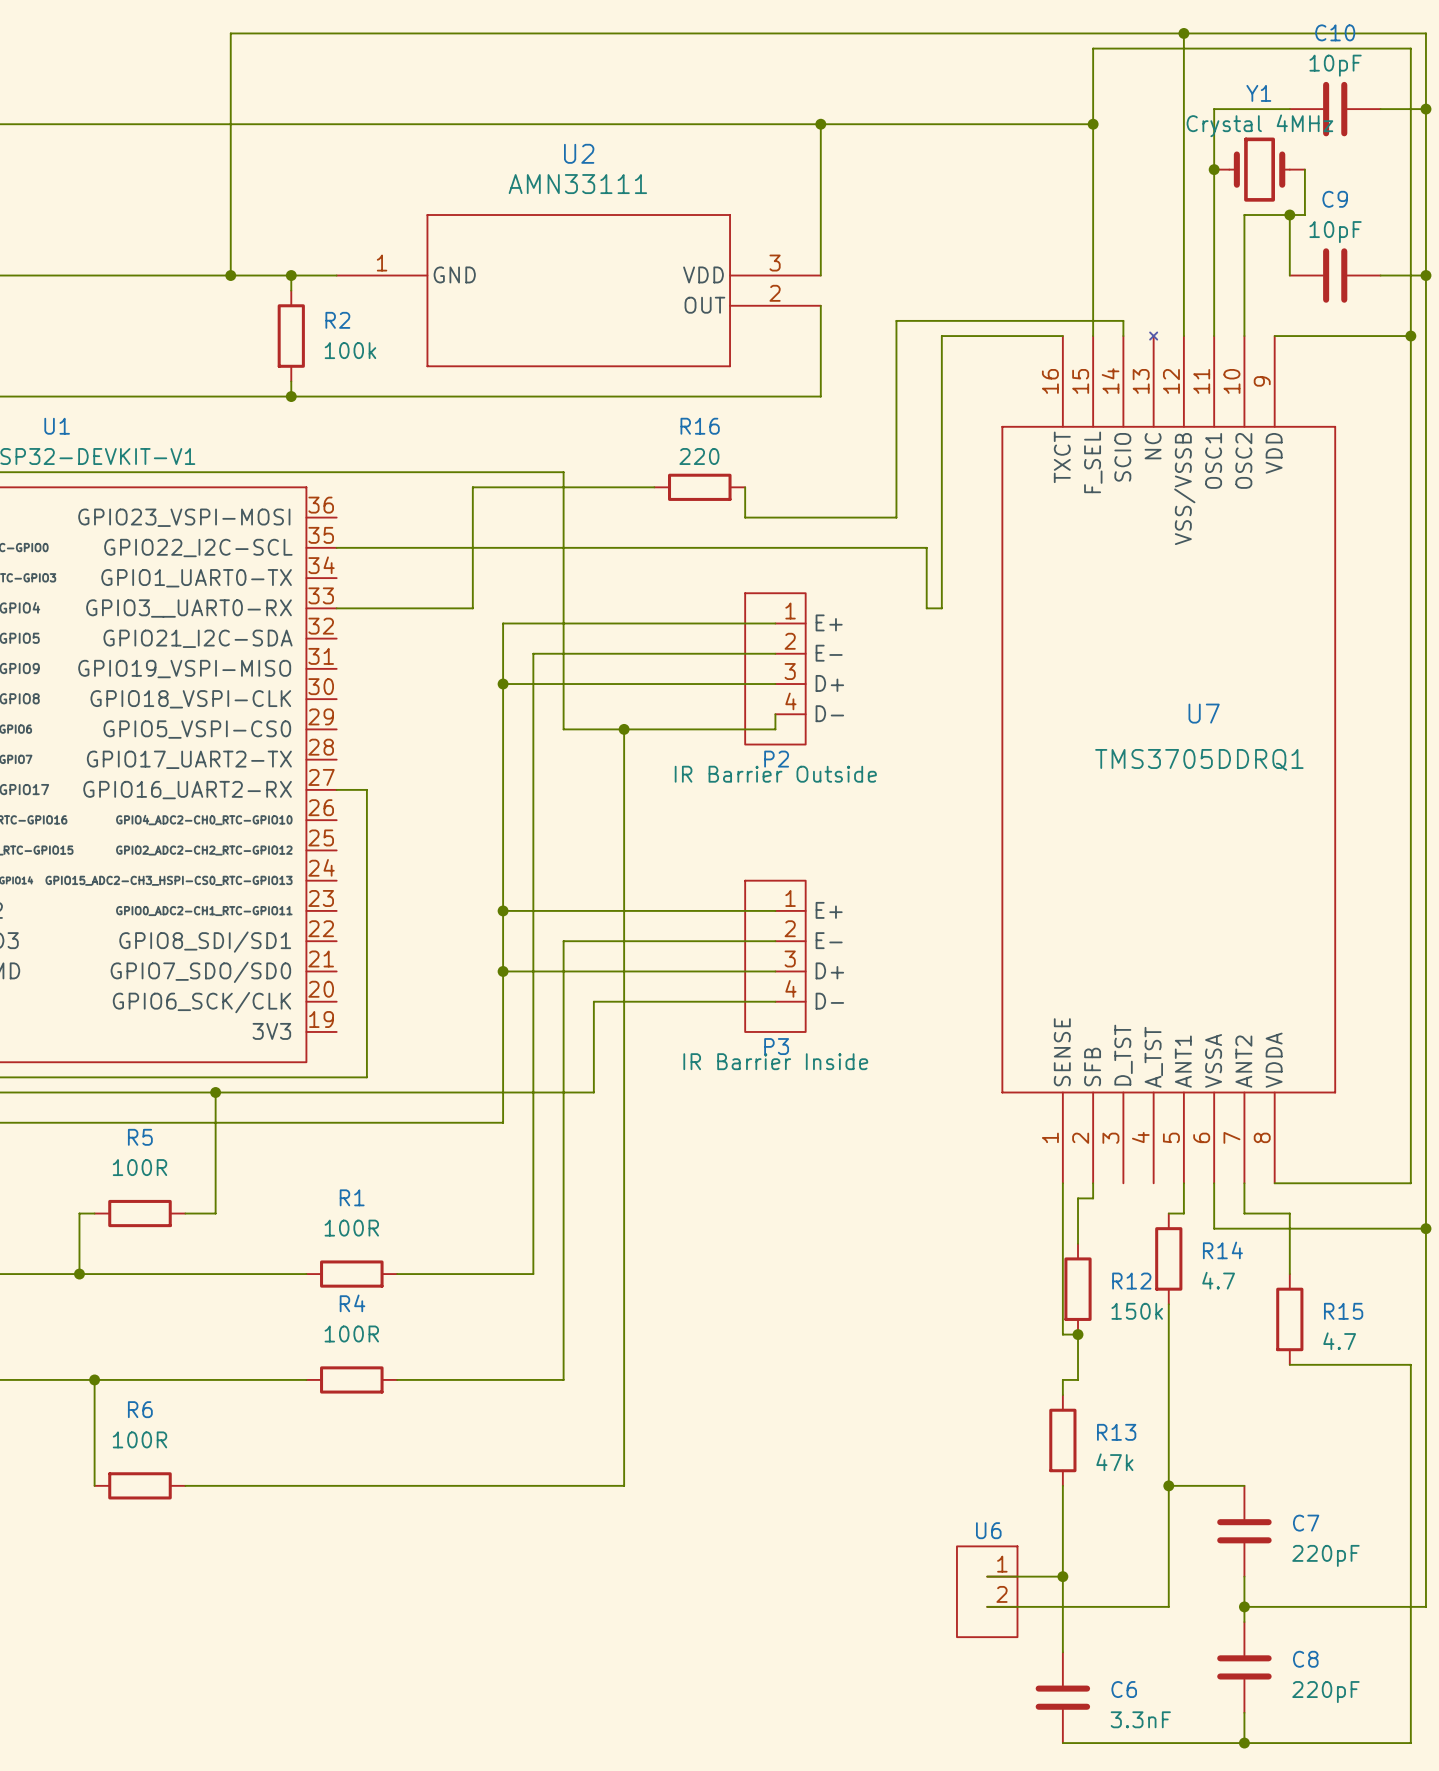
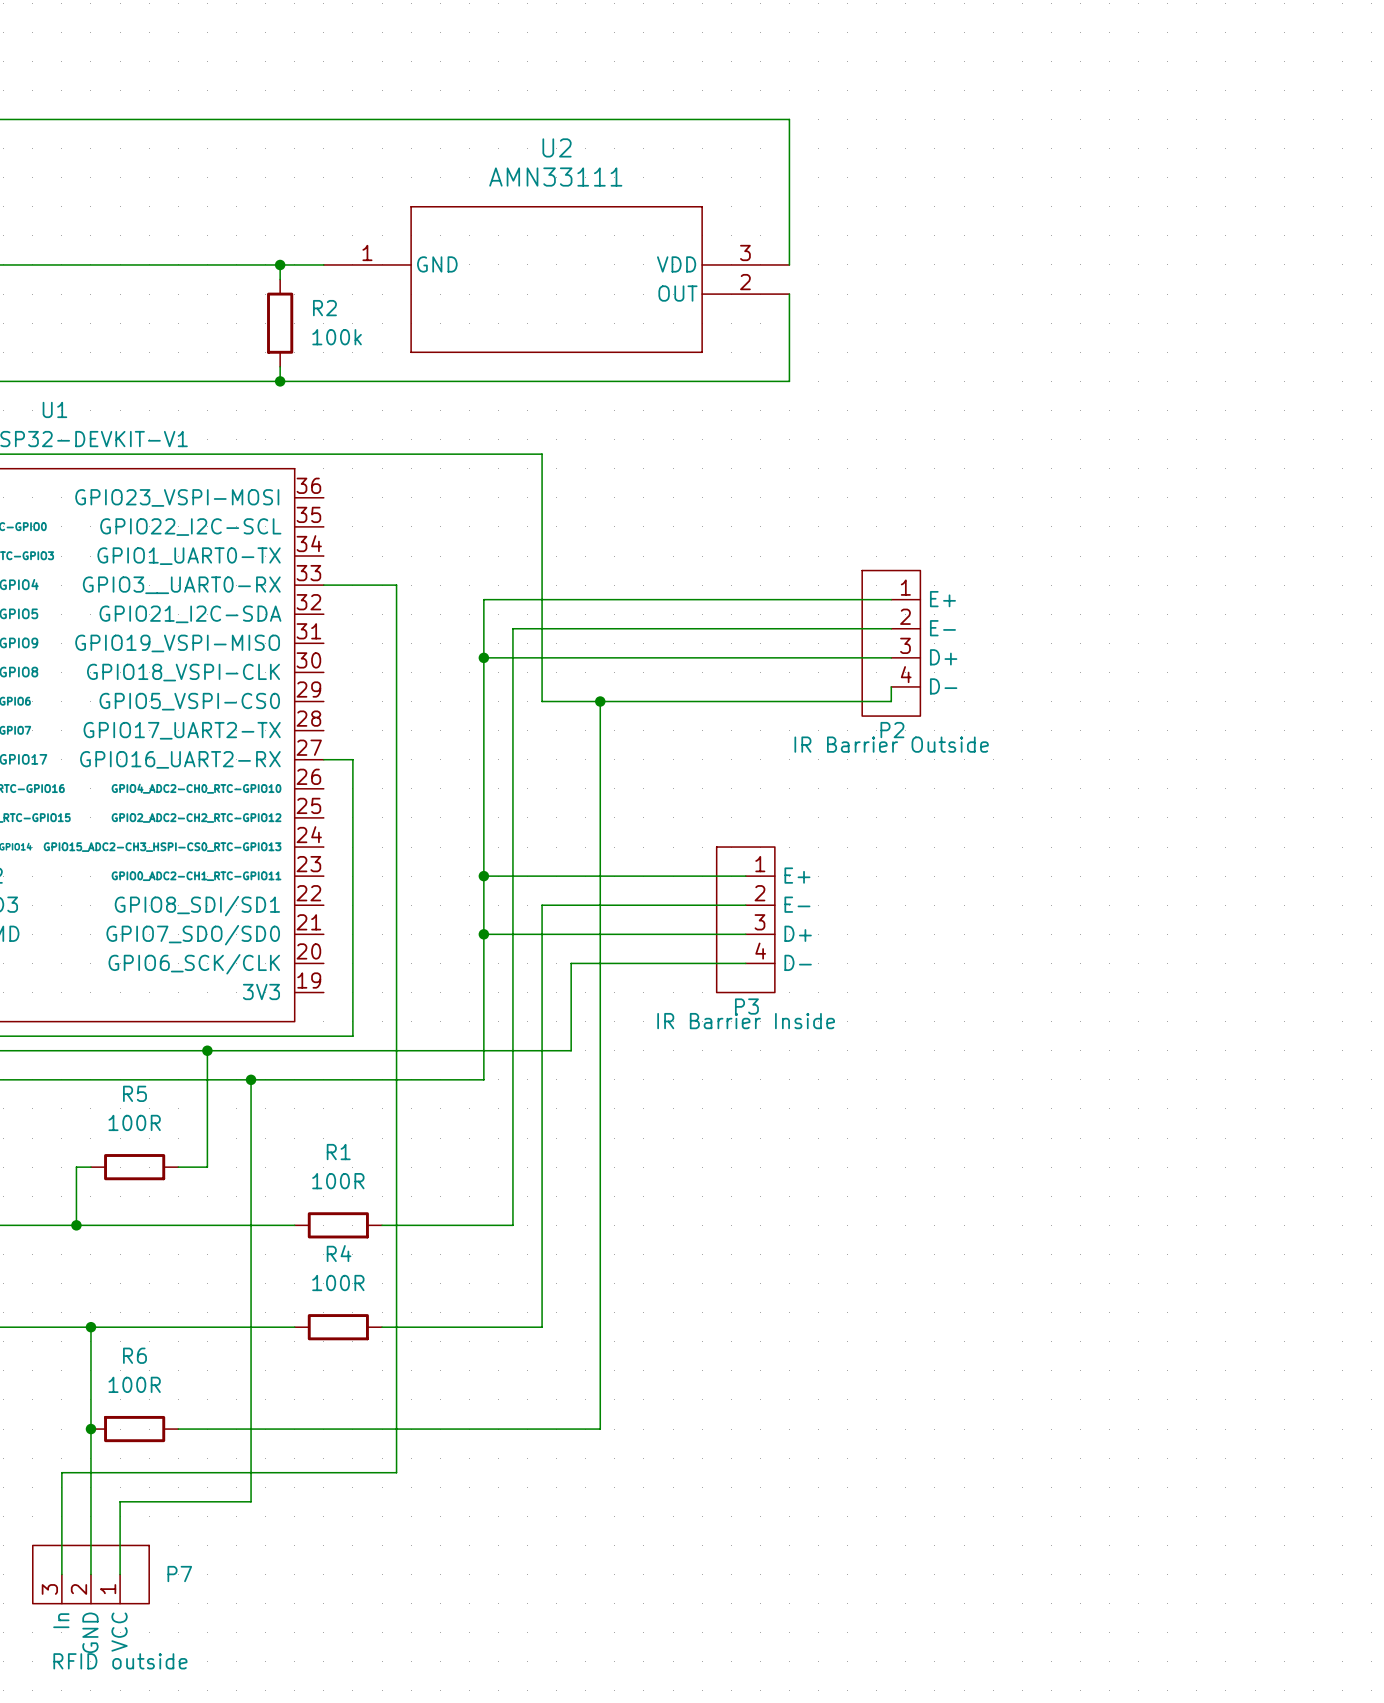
wire: (1183, 33) (1183, 336) -> none
junction: (1183, 33) -> none
wire: (1289, 109) (1214, 109) (1214, 336) -> none
C10: 10pF (1335, 109) -> none
wire: (1380, 109) (1425, 109) -> none
junction: (1425, 109) -> none
wire: (820, 124) (1093, 124) -> none
junction: (820, 124) -> none
junction: (1093, 124) -> none
junction: (1214, 169) -> none
Y1: Crystal 4MHz (1259, 169) -> none
wire: (1304, 169) (1304, 215) (1244, 215) (1244, 336) -> none
wire: (1289, 215) (1289, 275) -> none
junction: (1289, 215) -> none
wire: (230, 275) (230, 33) (1425, 33) (1425, 1606) (1244, 1606) -> none
junction: (230, 275) -> none
C9: 10pF (1335, 275) -> none
wire: (1380, 275) (1425, 275) -> none
junction: (1425, 275) -> none
wire: (1062, 336) (941, 336) (941, 608) (926, 608) (926, 547) (336, 547) -> none
wire: (1093, 336) (1093, 48) (1410, 48) (1410, 1183) (1274, 1183) -> none
wire: (1123, 336) (1123, 320) (896, 320) (896, 517) (745, 517) (745, 487) -> none
wire: (1274, 336) (1410, 336) -> none
junction: (1410, 336) -> none
wire: (654, 487) (472, 487) (472, 608) (412, 608) -> (61, 1574) (61, 1472) (396, 1472) (396, 585)
R16: 220 (699, 487) -> none
wire: none -> (745, 599) (891, 599)
wire: none -> (745, 628) (891, 628)
P2 position: (775, 668) -> (891, 643)
wire: none -> (745, 657) (891, 657)
wire: (775, 714) (775, 729) -> (891, 686) (891, 701) (745, 701)
U7: TMS3705DDRQ1 (1168, 757) -> none
wire: none -> (251, 1079) (251, 1501) (120, 1501) (120, 1574)
junction: none -> (251, 1079)
wire: (1062, 1183) (1062, 1334) (1078, 1334) (1078, 1379) (1062, 1379) (1062, 1395) -> none
wire: (1093, 1183) (1093, 1198) (1078, 1198) (1078, 1243) -> none
wire: (1183, 1183) (1183, 1213) (1168, 1213) -> none
wire: (1214, 1183) (1214, 1228) (1425, 1228) -> none
wire: (1244, 1183) (1244, 1213) (1289, 1213) (1289, 1274) -> none
junction: (1425, 1228) -> none
R14: 4.7 (1168, 1258) -> none
R12: 150k (1078, 1289) -> none
wire: (1168, 1304) (1168, 1606) (987, 1606) -> none
R15: 4.7 (1289, 1319) -> none
junction: (1078, 1334) -> none
wire: (1289, 1364) (1410, 1364) (1410, 1743) (1062, 1743) -> none
R13: 47k (1062, 1440) -> none
wire: none -> (90, 1429) (90, 1574)
junction: none -> (90, 1429)
wire: (1062, 1485) (1062, 1652) -> none
wire: (1168, 1485) (1244, 1485) -> none
junction: (1168, 1485) -> none
C7: 220pF (1244, 1531) -> none
wire: (987, 1576) (1062, 1576) -> none
junction: (1062, 1576) -> none
wire: (1244, 1576) (1244, 1622) -> none
U6: (987, 1591) -> none
junction: (1244, 1606) -> none
P7: none -> RFID outside (90, 1574)
C8: 220pF (1244, 1667) -> none
C6: 3.3nF (1062, 1697) -> none
wire: (1244, 1712) (1244, 1743) -> none
junction: (1244, 1743) -> none

